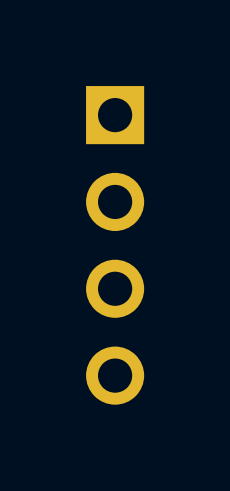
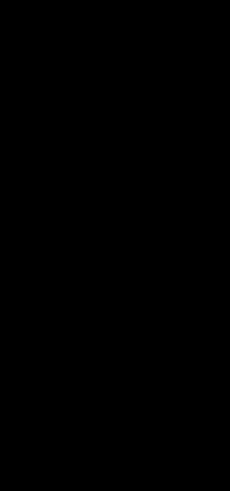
part: (115, 245) -> none

